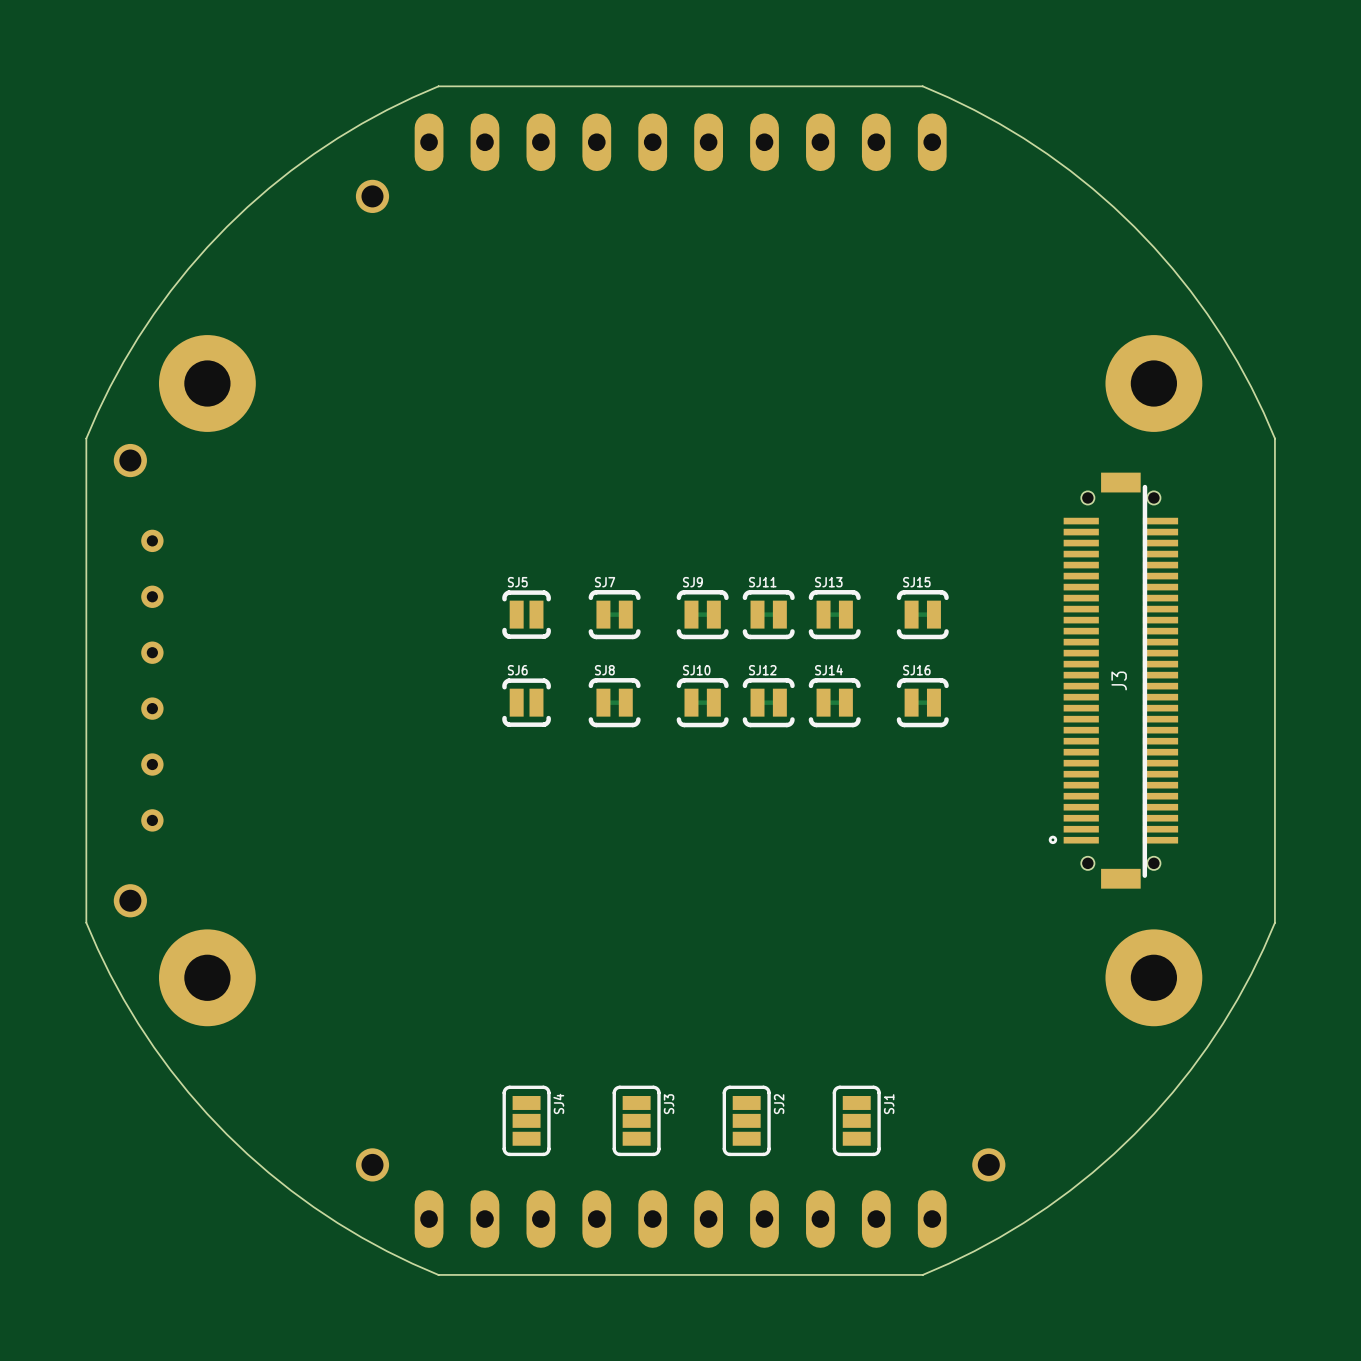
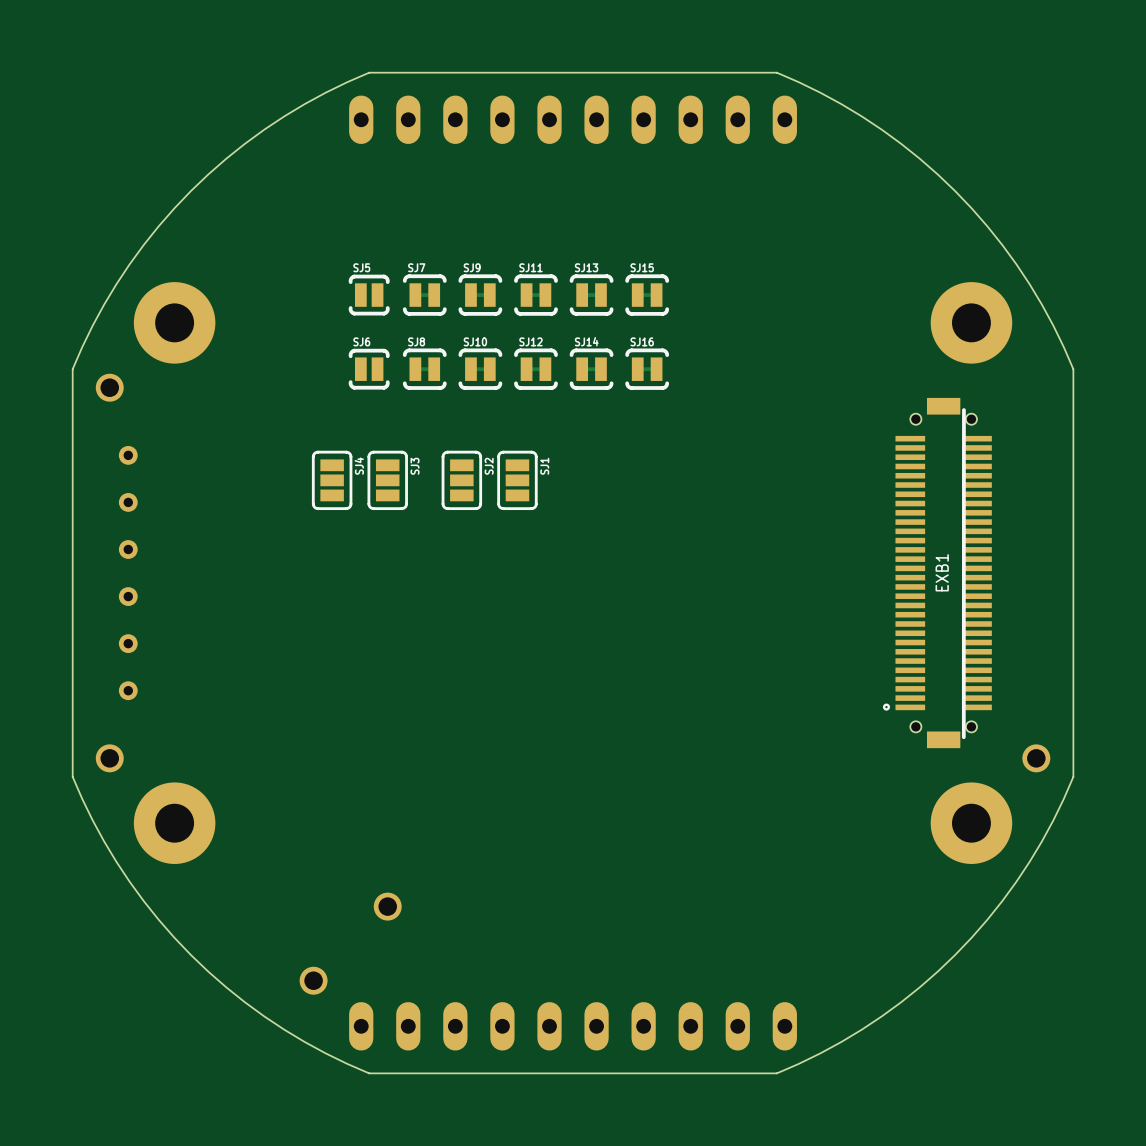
part: (372, 196) -> none
SJ5 position: (526, 614) -> (369, 295)
SJ7 position: (614, 614) -> (424, 295)
SJ9 position: (702, 614) -> (480, 295)
SJ11 position: (768, 614) -> (535, 295)
SJ13 position: (834, 614) -> (591, 295)
SJ15 position: (922, 614) -> (647, 295)
J3 name: J3 (1119, 680) -> EXB1 (942, 572)
SJ6 position: (526, 702) -> (369, 369)
SJ8 position: (614, 702) -> (424, 369)
SJ10 position: (702, 702) -> (480, 369)
SJ12 position: (768, 702) -> (535, 369)
SJ14 position: (834, 702) -> (591, 369)
SJ16 position: (922, 702) -> (647, 369)
part: none -> (1036, 758)
part: none -> (387, 906)
SJ4 position: (526, 1120) -> (332, 480)
SJ3 position: (636, 1120) -> (387, 480)
SJ2 position: (746, 1120) -> (461, 480)
SJ1 position: (856, 1120) -> (517, 480)
part: (988, 1164) -> none

